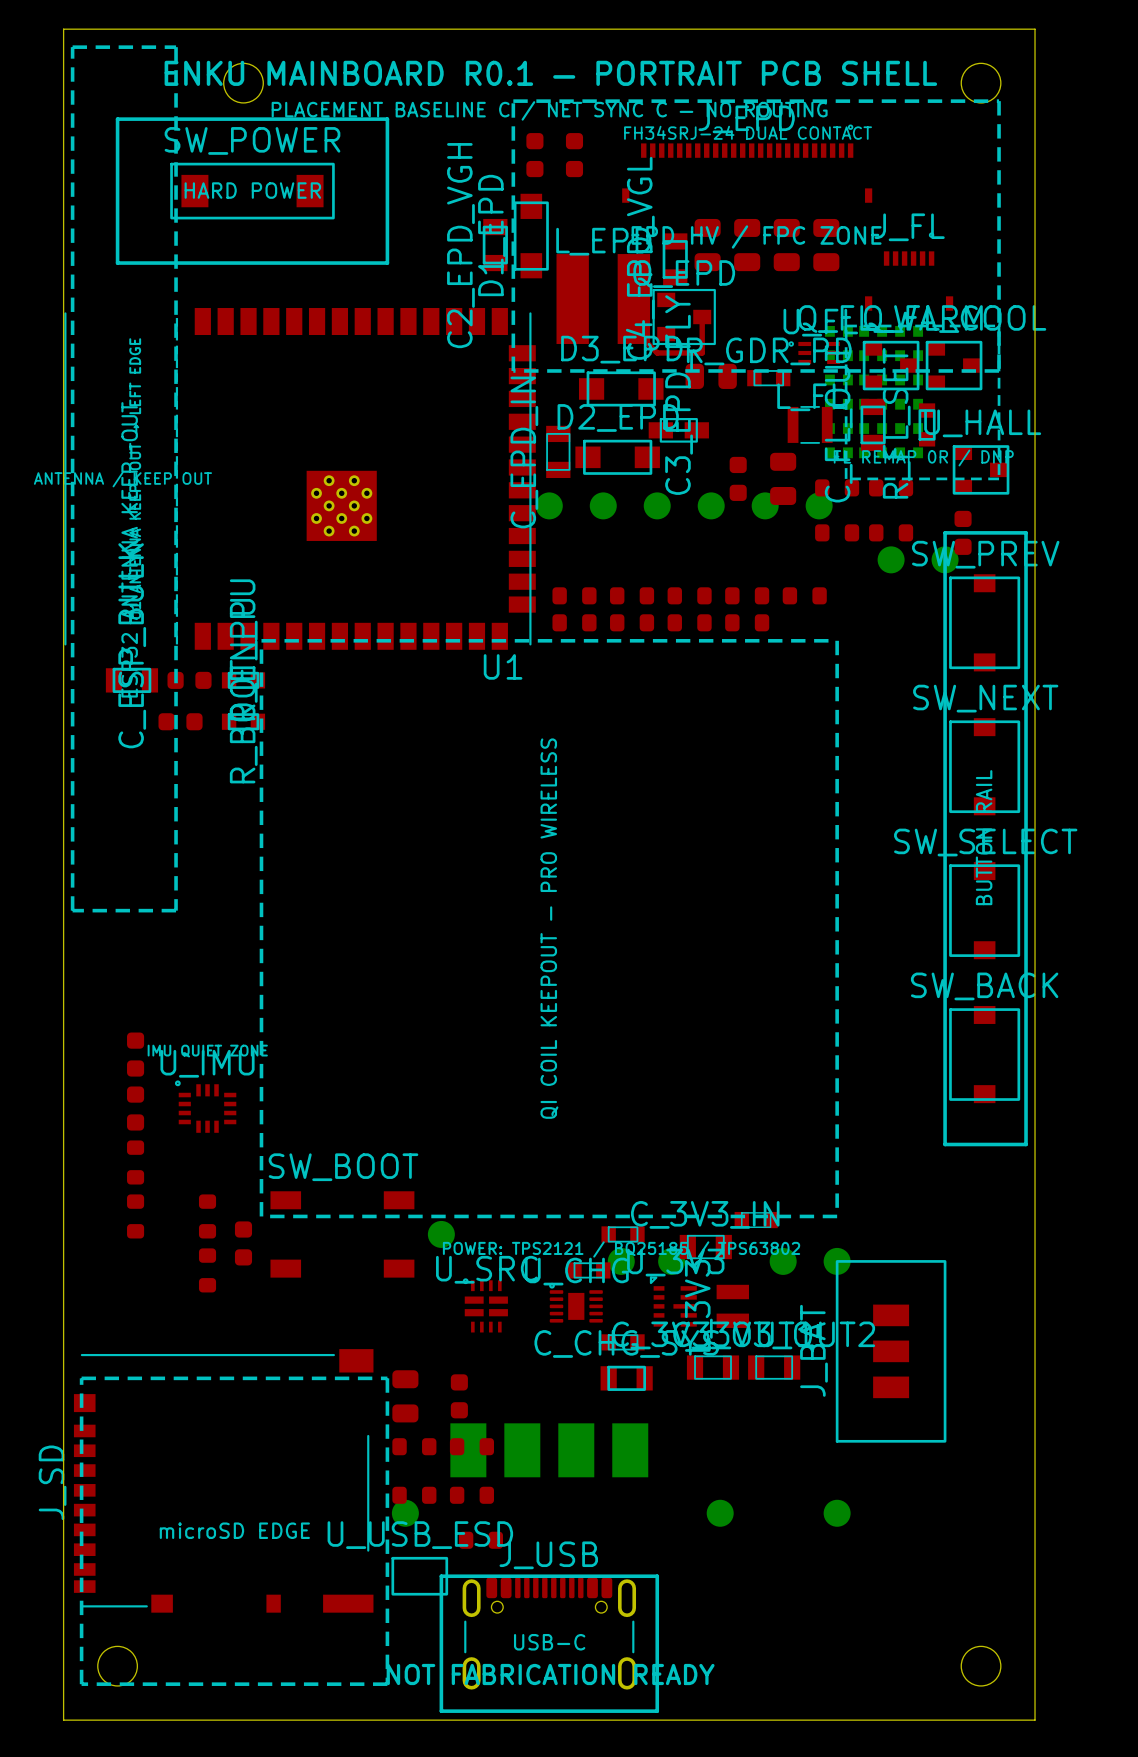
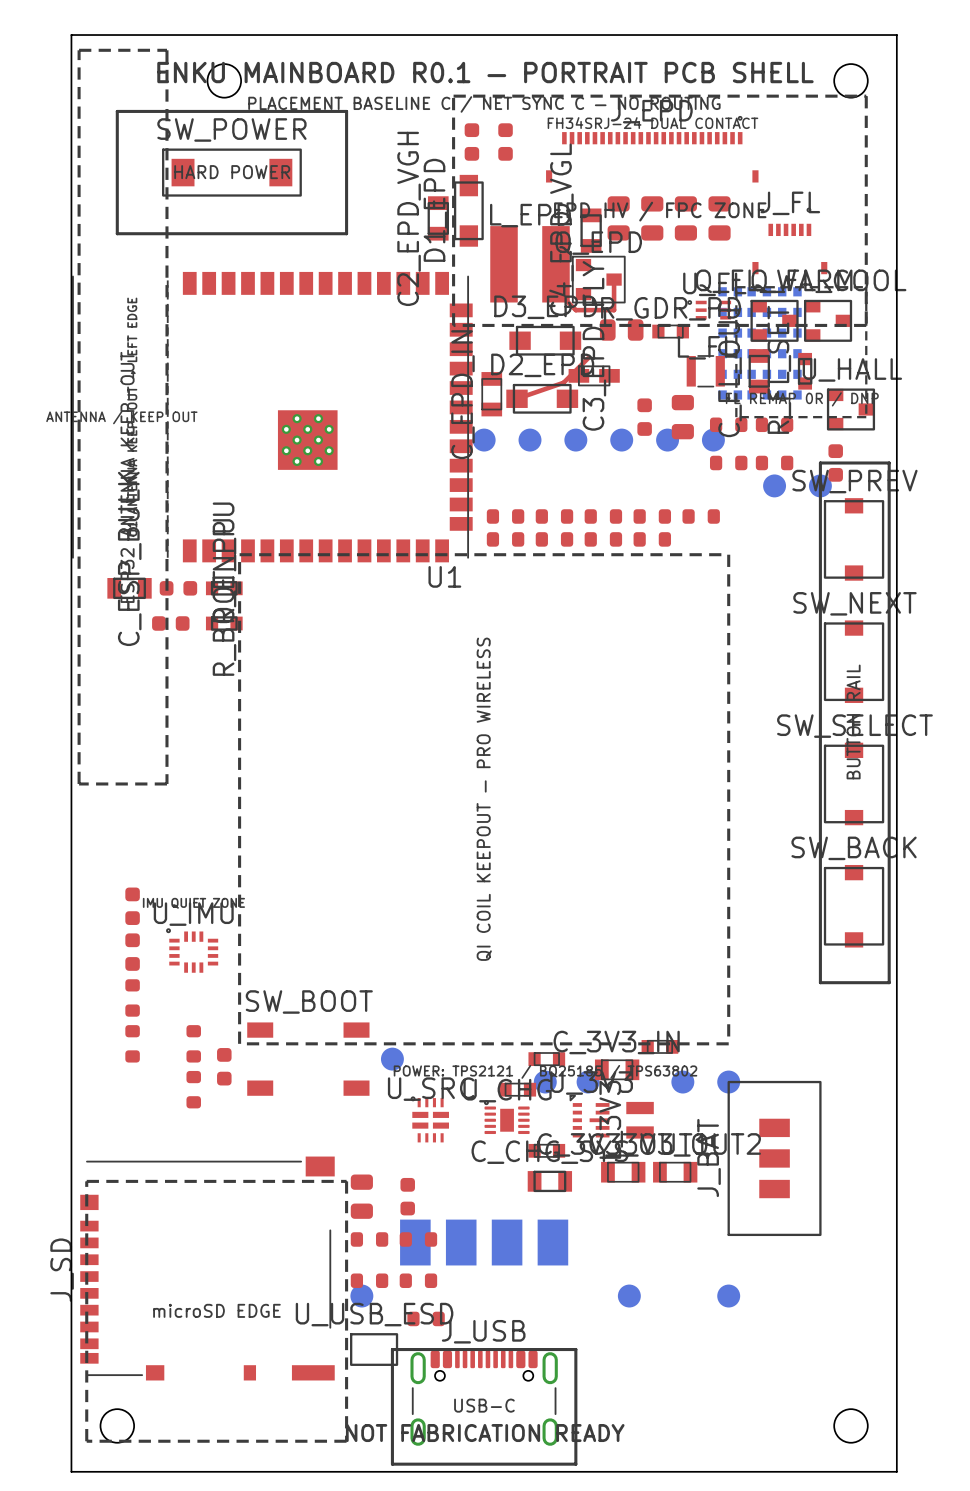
top track: none -> (588, 358) (563, 382) (517, 398)

